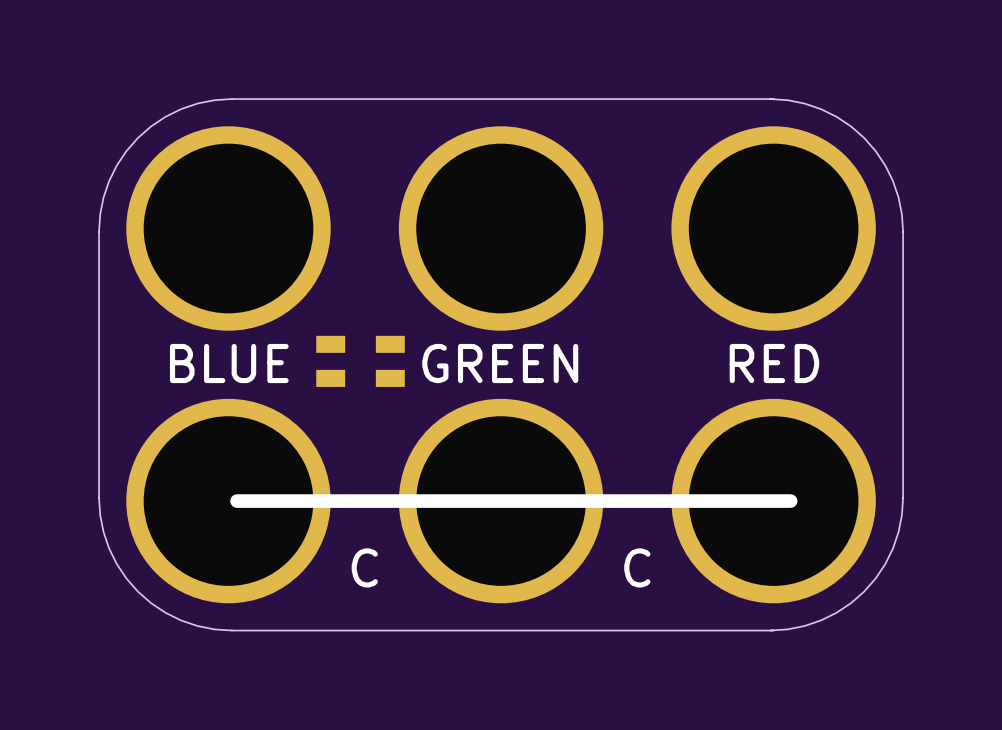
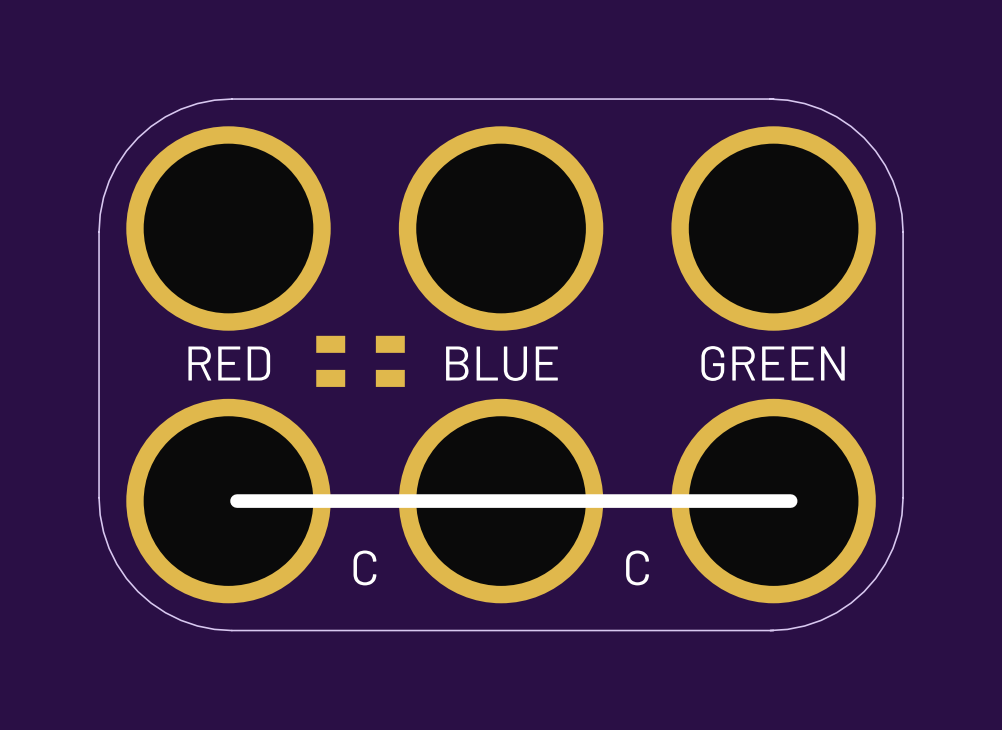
part text: BLUE (229, 363) -> RED (229, 363)
part text: GREEN (500, 363) -> BLUE (501, 363)
part text: RED (774, 363) -> GREEN (773, 363)

